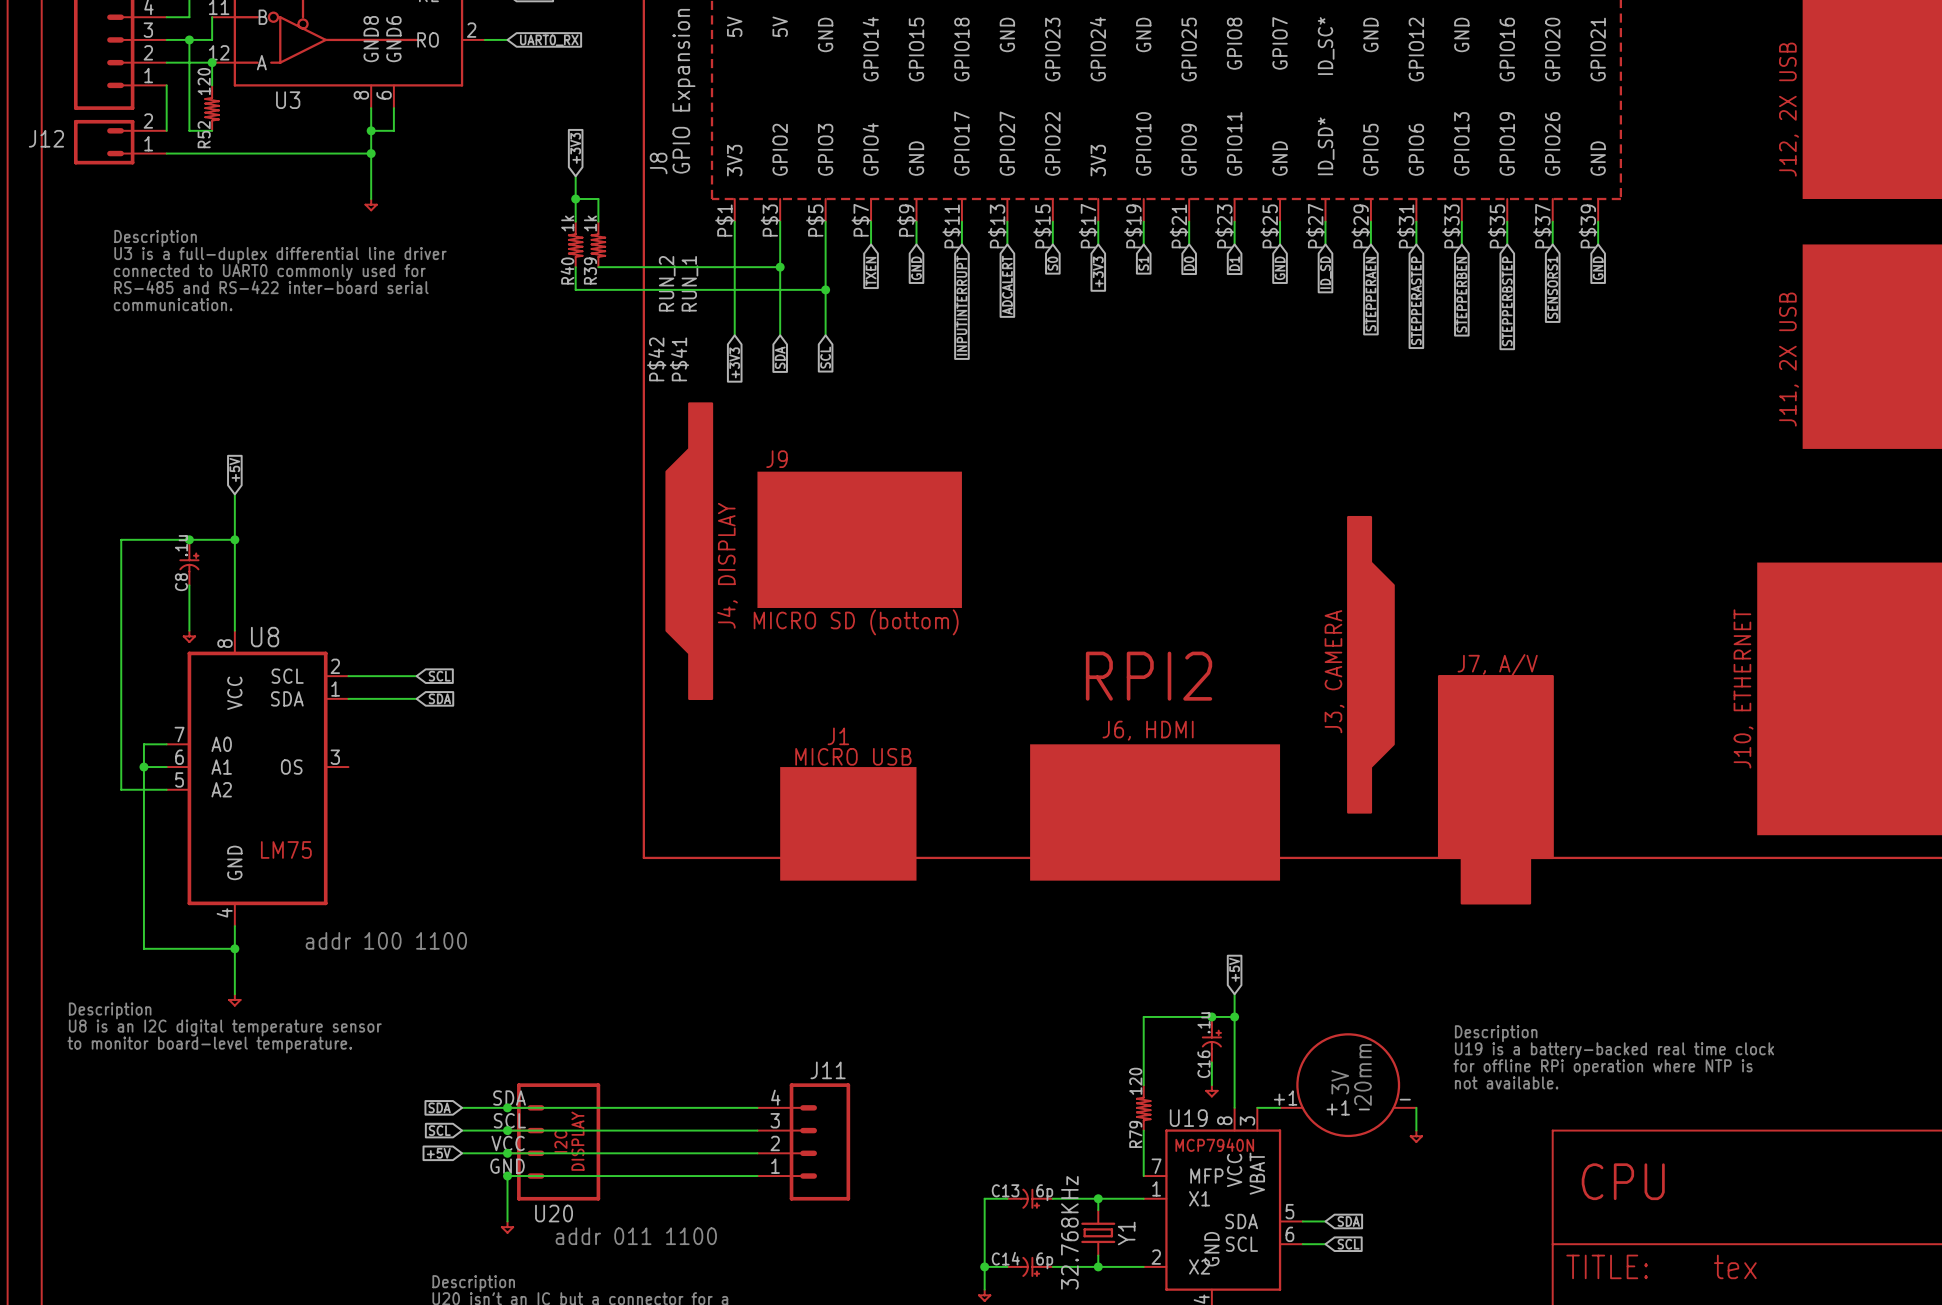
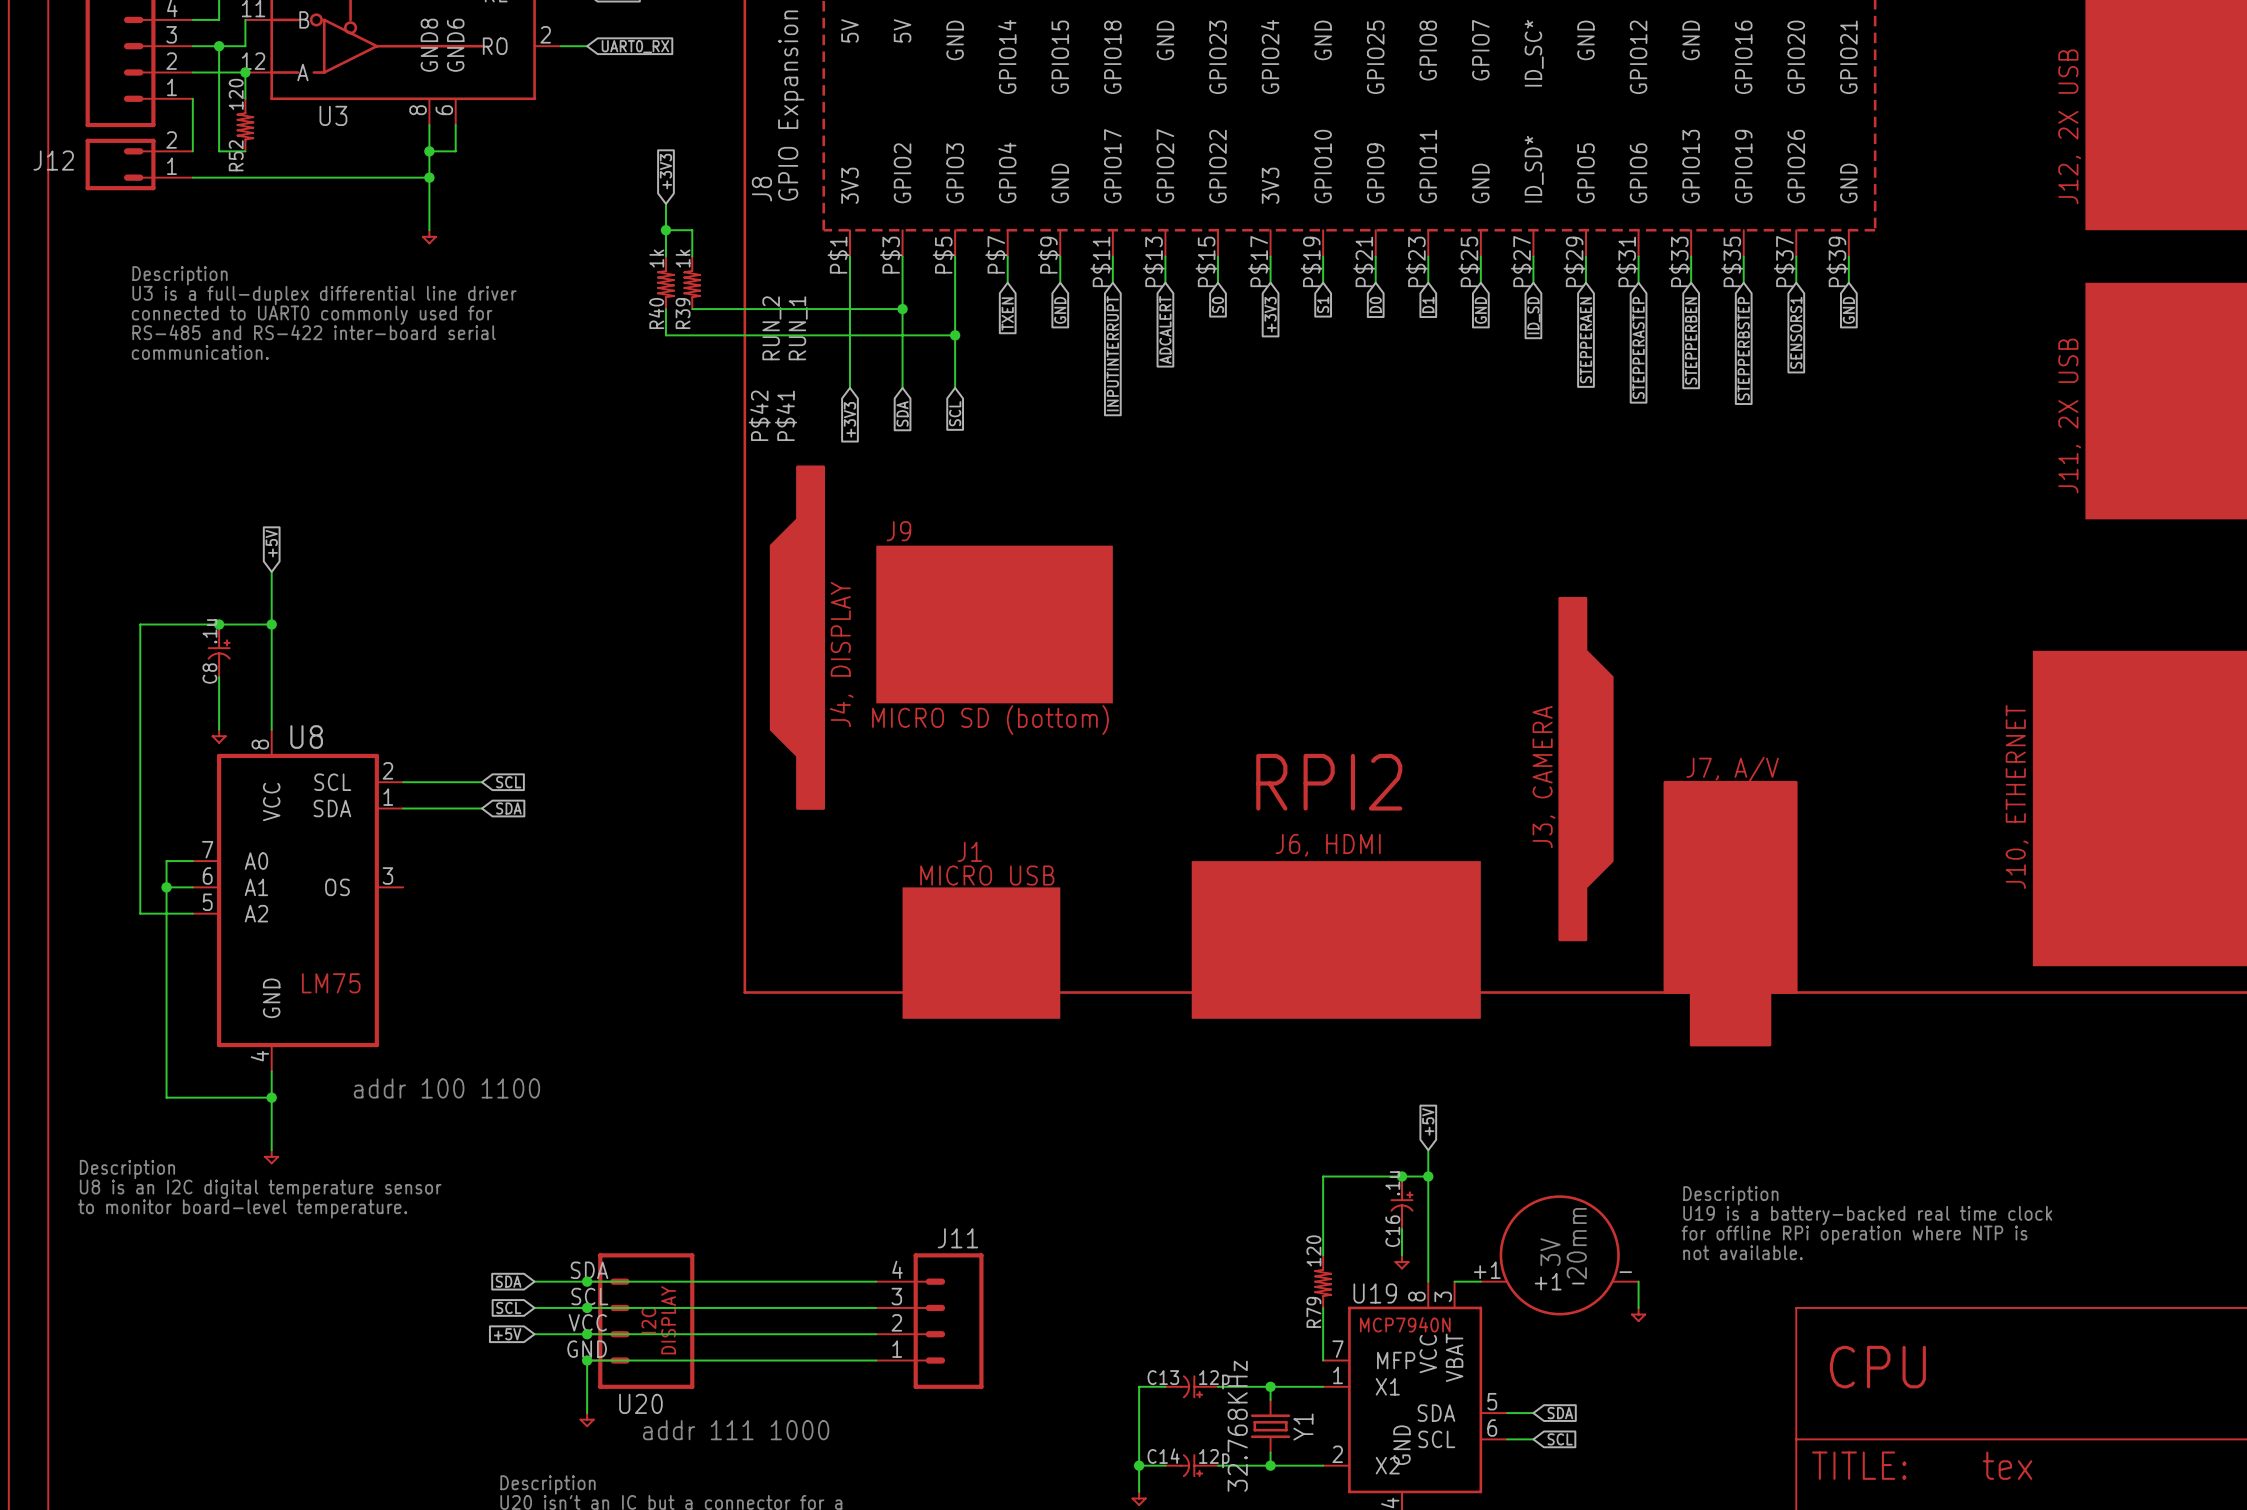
C13 value: 6p (1044, 1192) -> 12p (1214, 1379)
text: addr 011 1100 (636, 1236) -> addr 111 1000 (736, 1430)
C14 value: 6p (1044, 1260) -> 12p (1214, 1458)

